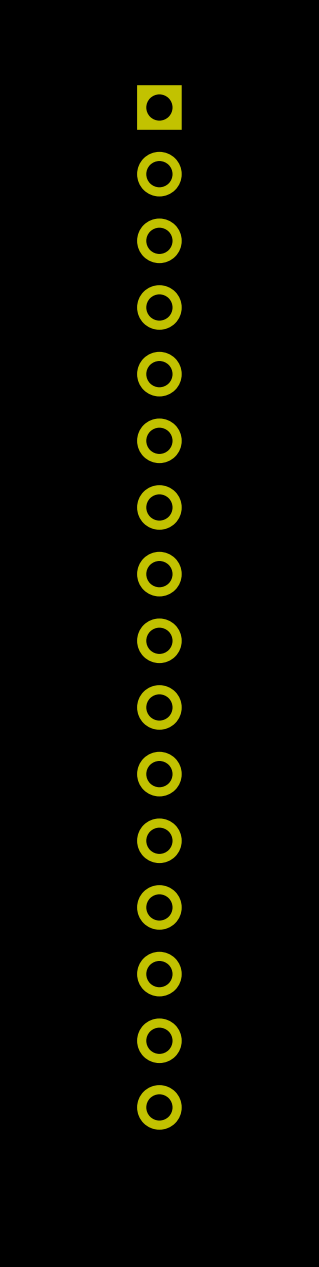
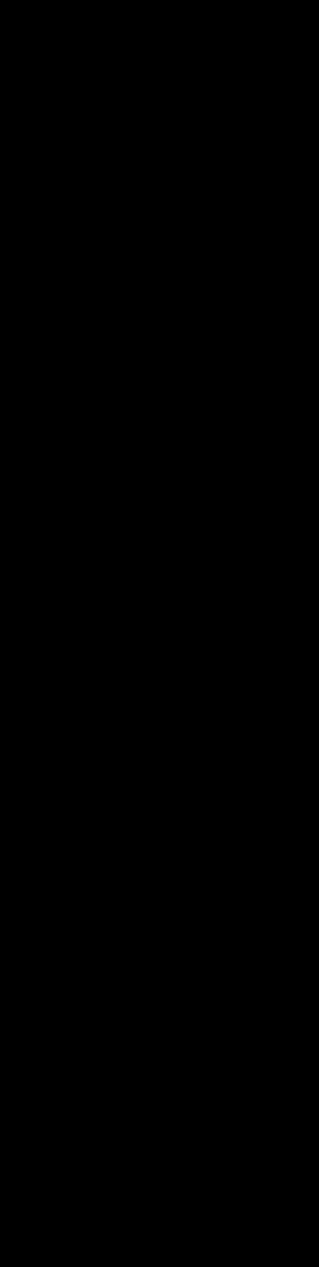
part: (159, 607) -> none

